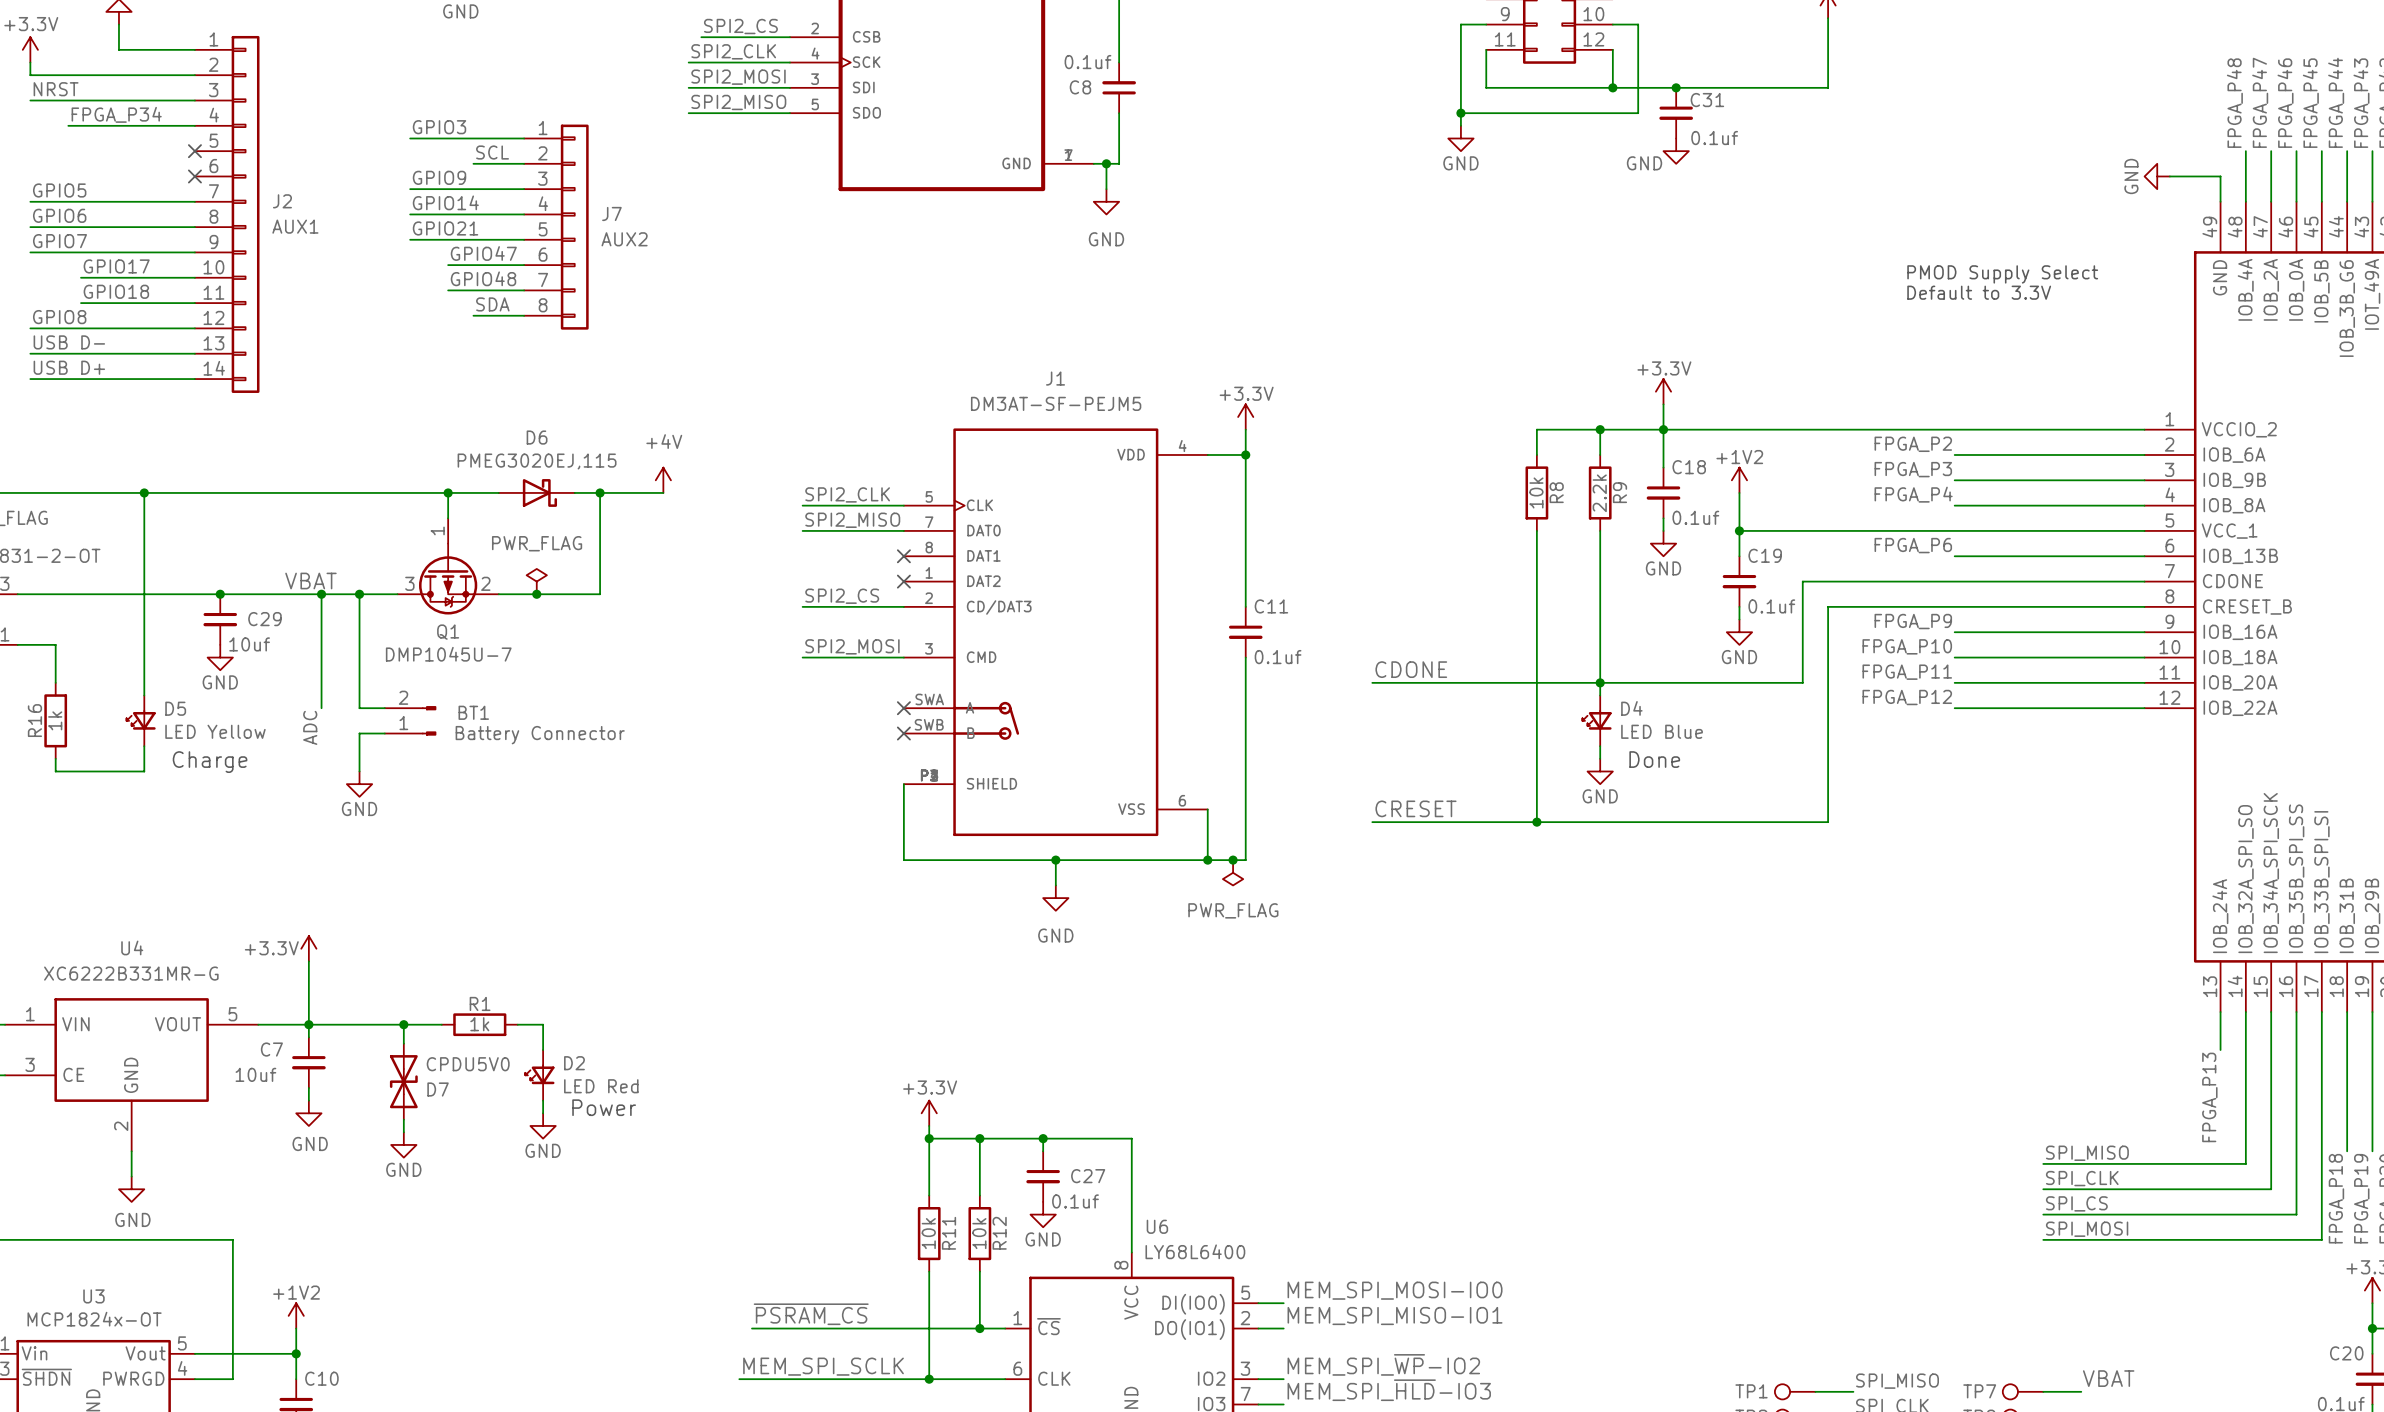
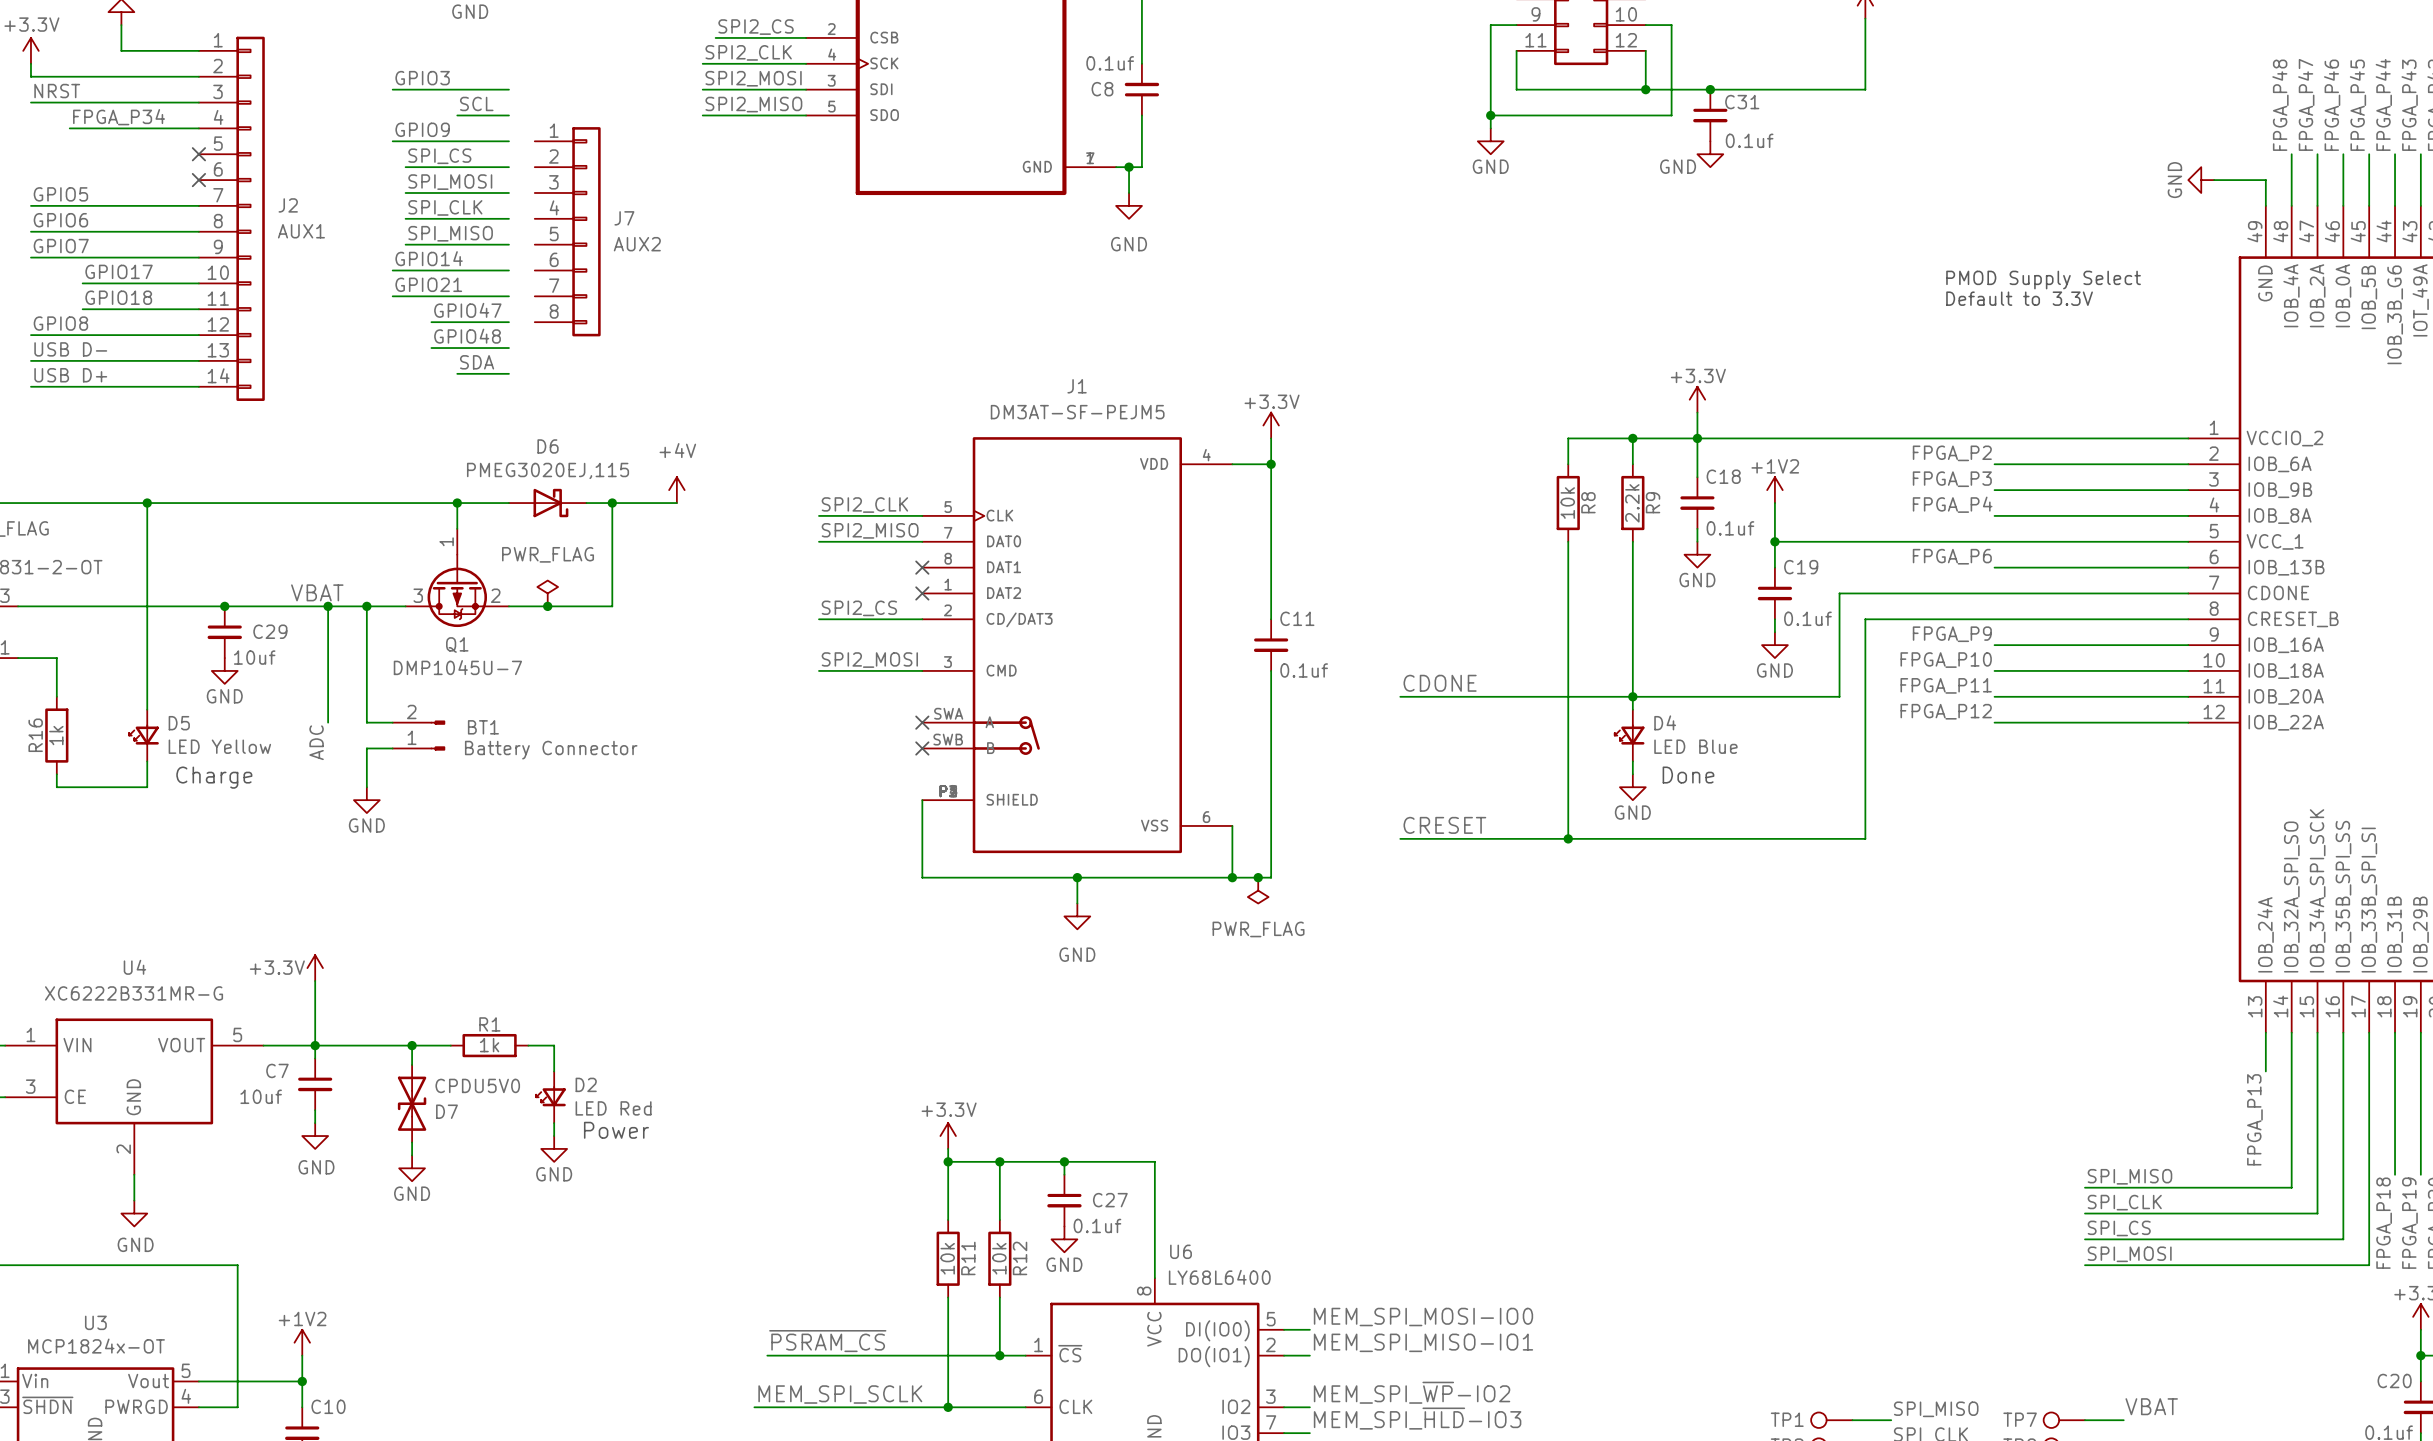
wire: none -> (392, 89) (508, 89)
wire: none -> (457, 115) (508, 115)
label position: GPIO3 (439, 127) -> GPIO3 (422, 78)
wire: (498, 138) (524, 138) -> (392, 141) (418, 141)
label position: SCL (492, 152) -> SCL (476, 103)
label: none -> SPI_CS (439, 156)
wire: none -> (405, 167) (483, 167)
wire: (498, 163) (524, 163) -> none
label position: GPIO9 (439, 177) -> GPIO9 (422, 129)
label: none -> SPI_MOSI (450, 182)
wire: none -> (405, 192) (418, 192)
wire: (498, 189) (524, 189) -> none
label position: GPIO14 (445, 202) -> GPIO14 (429, 258)
label: none -> SPI_CLK (445, 207)
wire: none -> (405, 218) (418, 218)
wire: (498, 214) (524, 214) -> none
label position: GPIO21 (445, 228) -> GPIO21 (428, 284)
label: none -> SPI_MISO (450, 233)
wire: none -> (405, 244) (418, 244)
wire: (498, 239) (524, 239) -> none
label position: GPIO47 (483, 253) -> GPIO47 (467, 310)
wire: none -> (392, 270) (457, 270)
wire: (498, 265) (524, 265) -> none
label position: GPIO48 (483, 278) -> GPIO48 (467, 336)
wire: none -> (392, 296) (457, 296)
wire: (498, 290) (524, 290) -> none
label position: SDA (492, 304) -> SDA (477, 362)
wire: none -> (431, 322) (483, 322)
wire: (498, 315) (524, 315) -> none
wire: none -> (431, 348) (508, 348)
wire: none -> (457, 373) (508, 373)

